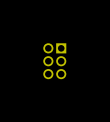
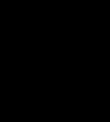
part: (54, 61) -> none

